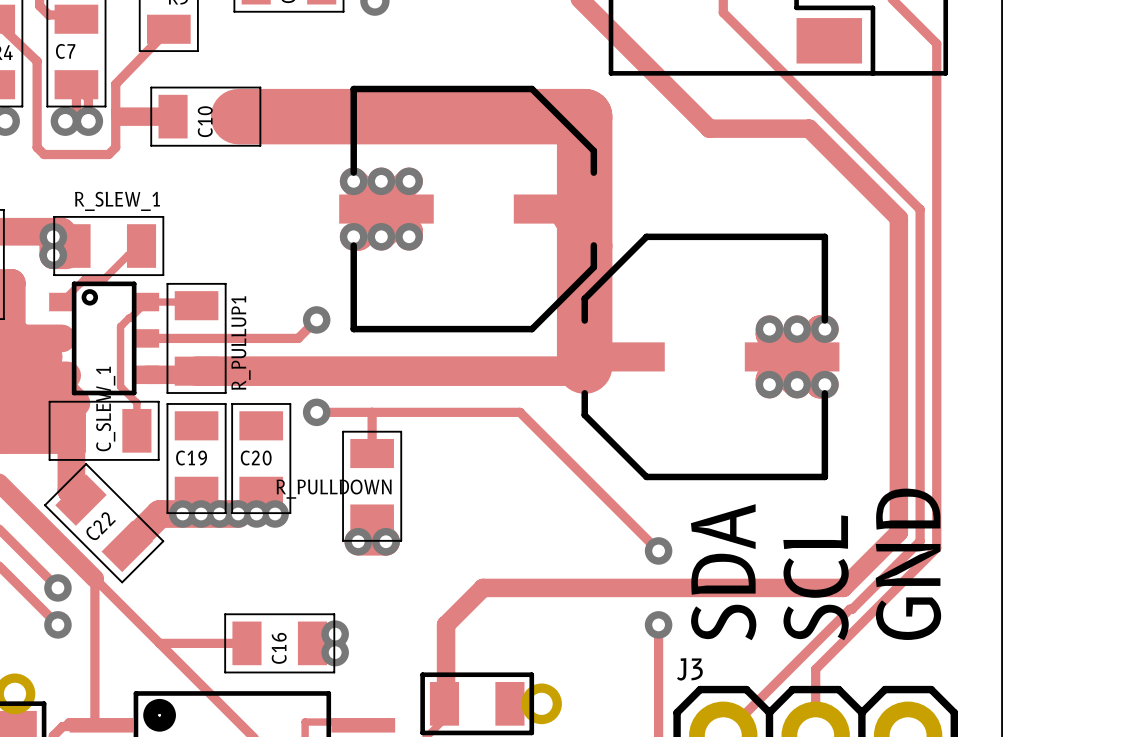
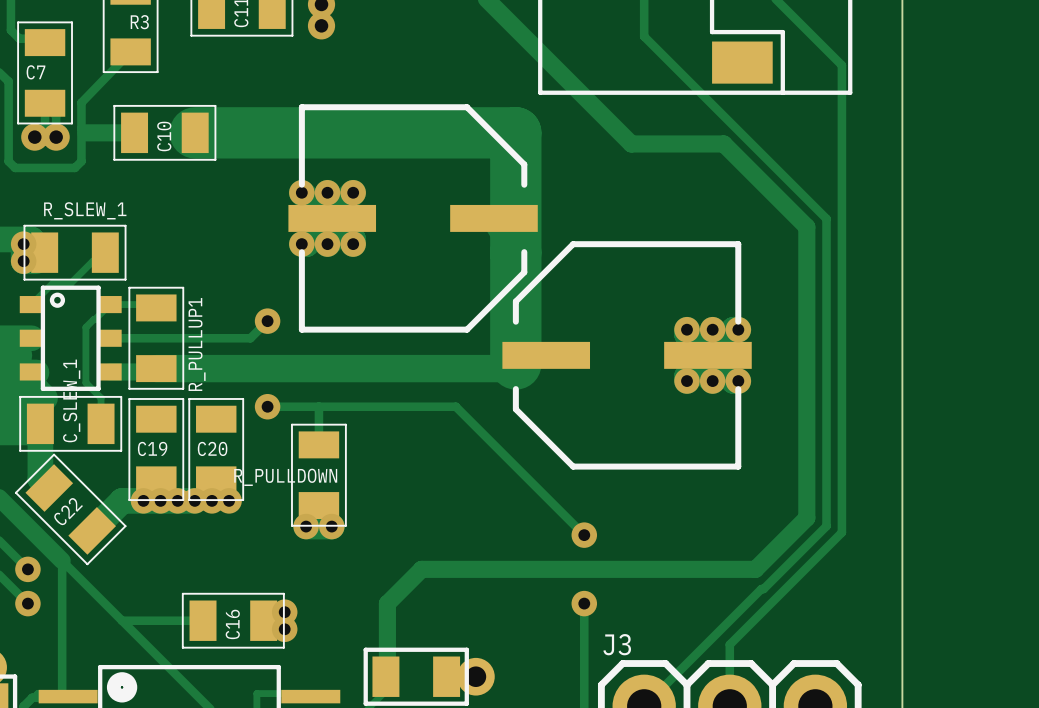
text: GND (908, 564) -> none
text: SDA (723, 572) -> none
text: SCL (816, 577) -> none

